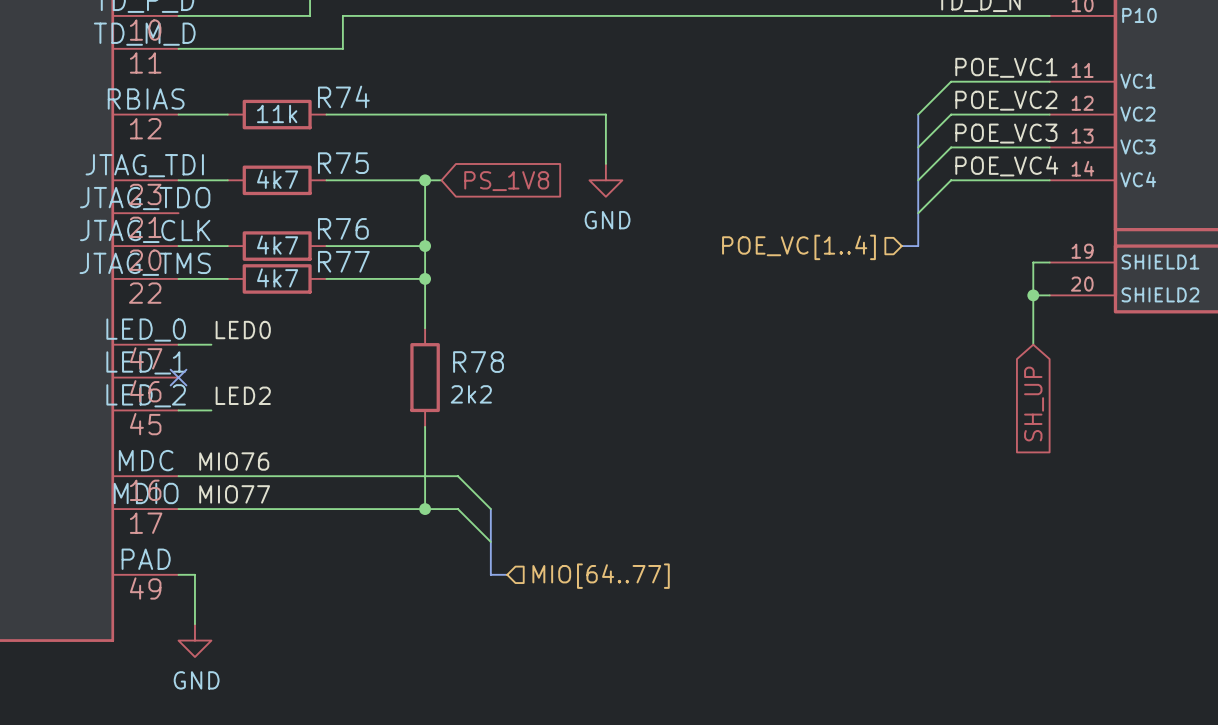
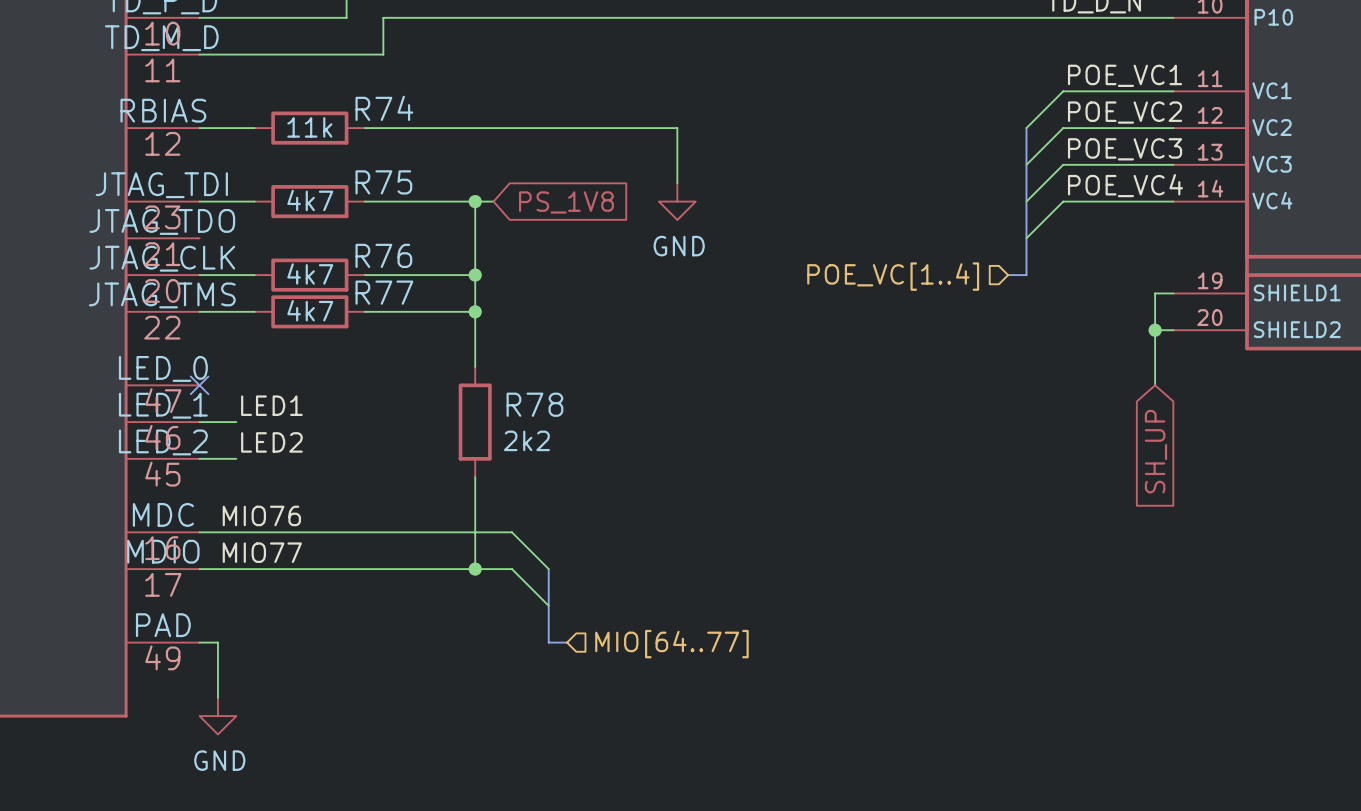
label: LED0 (243, 330) -> LED1 (271, 405)
wire: (178, 344) (211, 344) -> (199, 422) (236, 422)
no-connect mark position: (178, 377) -> (199, 385)

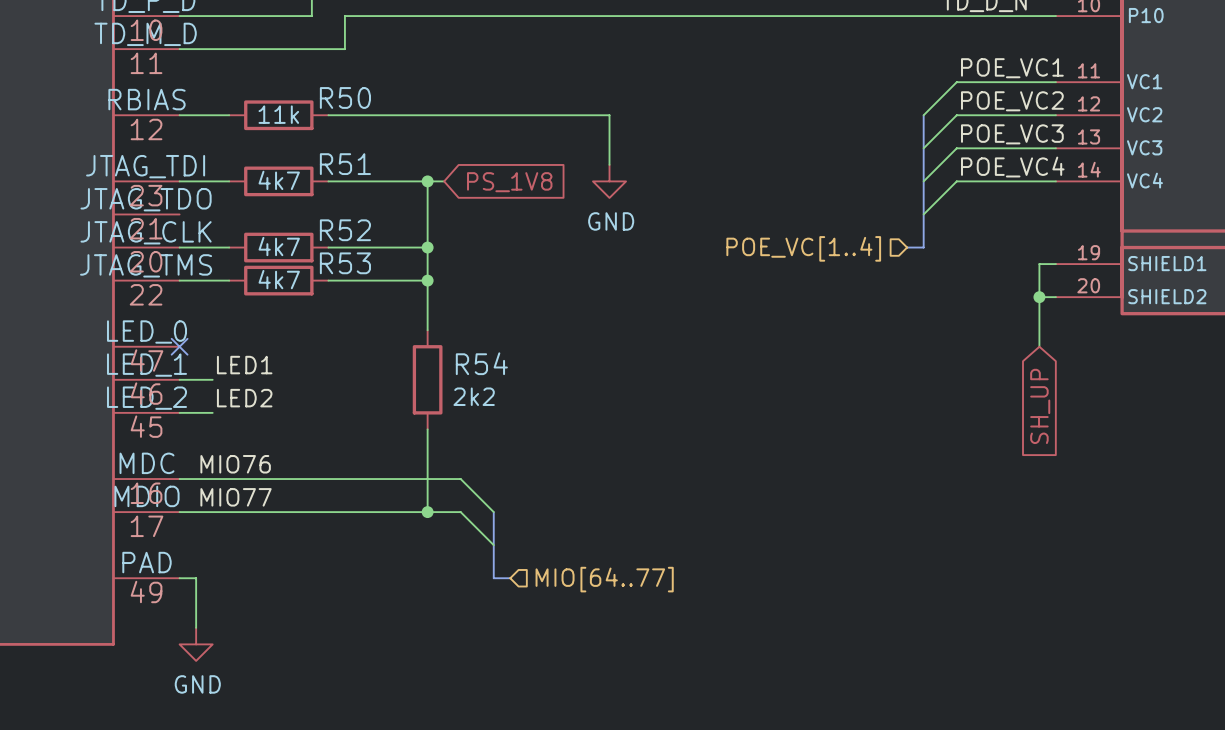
R74 name: R74 (384, 108) -> R50 (345, 97)
R75 name: R75 (383, 182) -> R51 (345, 164)
R76 name: R76 (383, 255) -> R52 (345, 230)
R77 name: R77 (384, 292) -> R53 (345, 263)
R78 name: R78 (534, 404) -> R54 (481, 363)

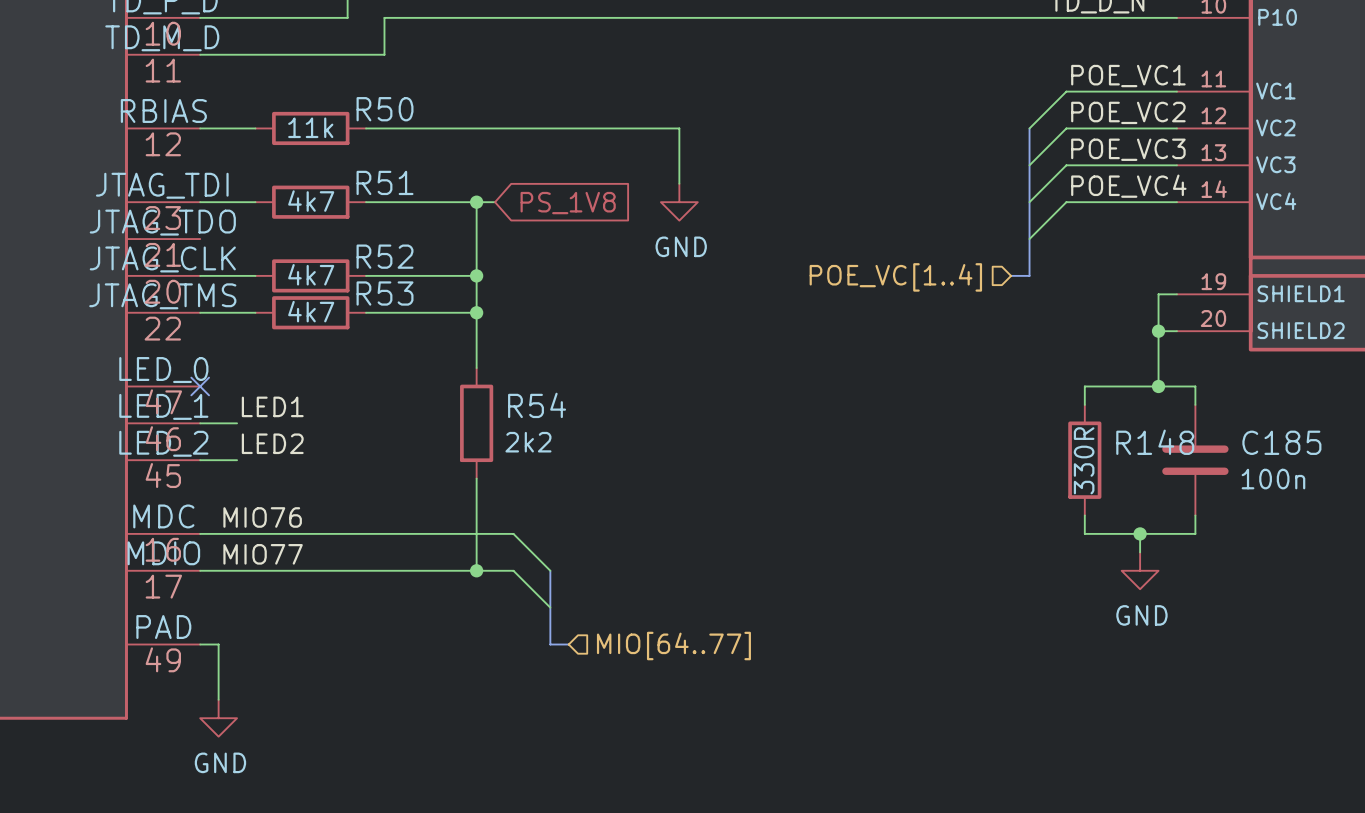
junction: none -> (1158, 386)
wire: none -> (1084, 404) (1084, 386) (1195, 386) (1195, 404)
global label: SH_UP (1040, 406) -> none
R148: none -> (1084, 460)
C185: none -> (1195, 460)
wire: none -> (1084, 515) (1084, 533) (1195, 533) (1195, 515)
wire: none -> (1140, 533) (1140, 552)
junction: none -> (1140, 533)
power symbol: none -> GND (1140, 570)

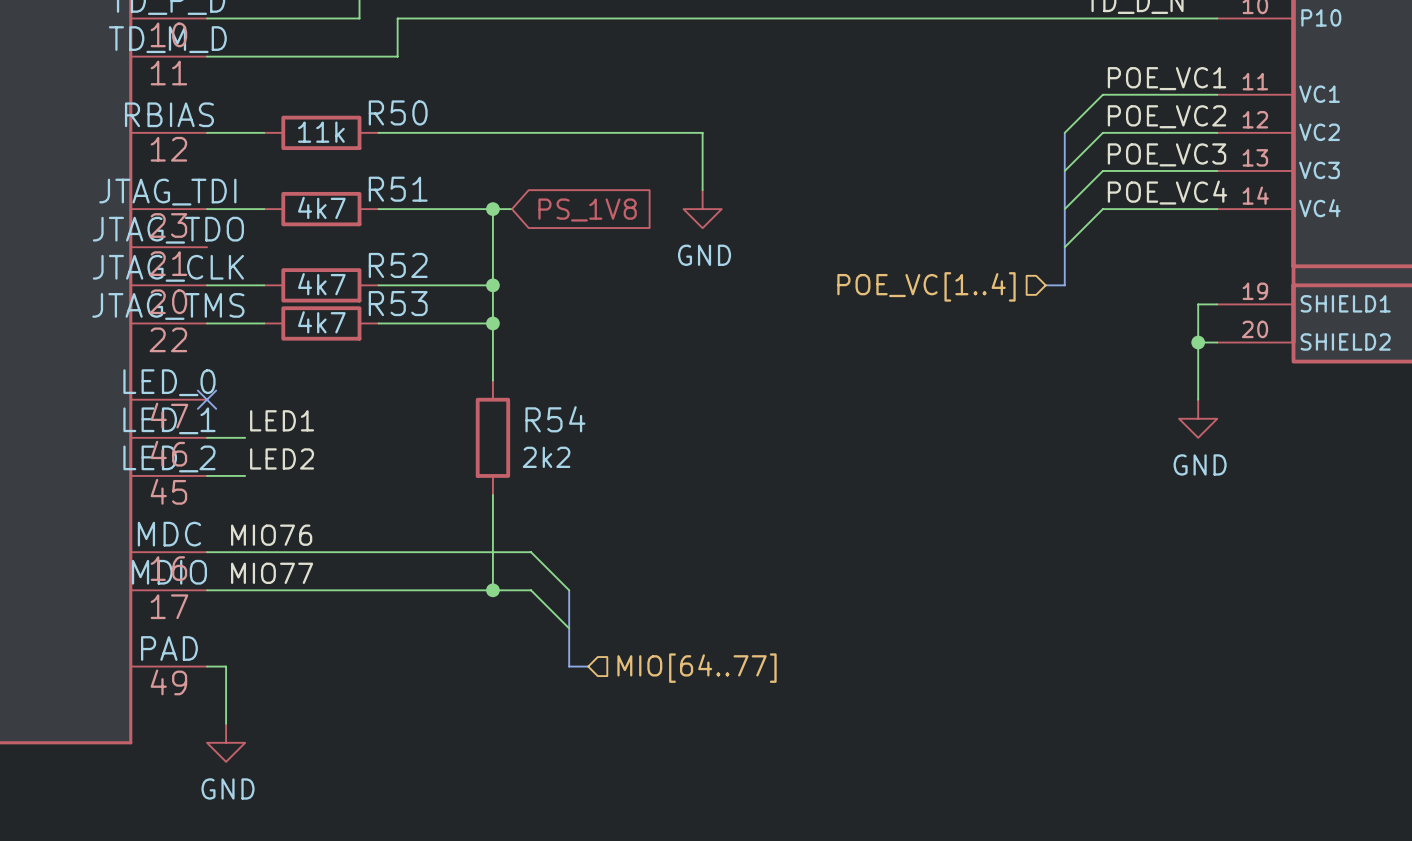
junction: (1158, 386) -> none
wire: (1084, 404) (1084, 386) (1195, 386) (1195, 404) -> none
R148: (1084, 460) -> none
C185: (1195, 460) -> none
wire: (1084, 515) (1084, 533) (1195, 533) (1195, 515) -> none
wire: (1140, 533) (1140, 552) -> none
junction: (1140, 533) -> none
power symbol position: GND (1140, 570) -> GND (1198, 418)

